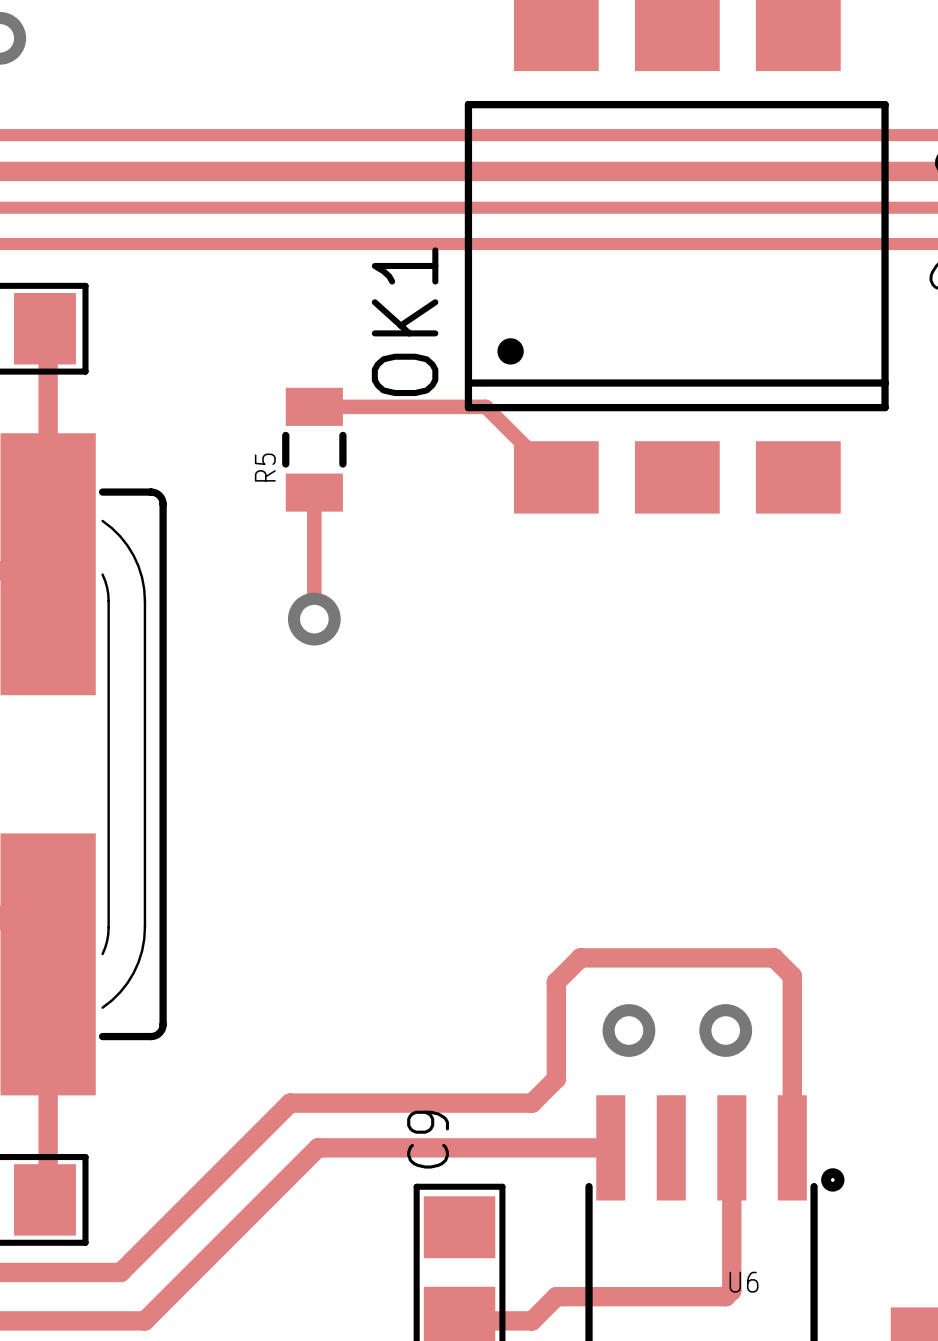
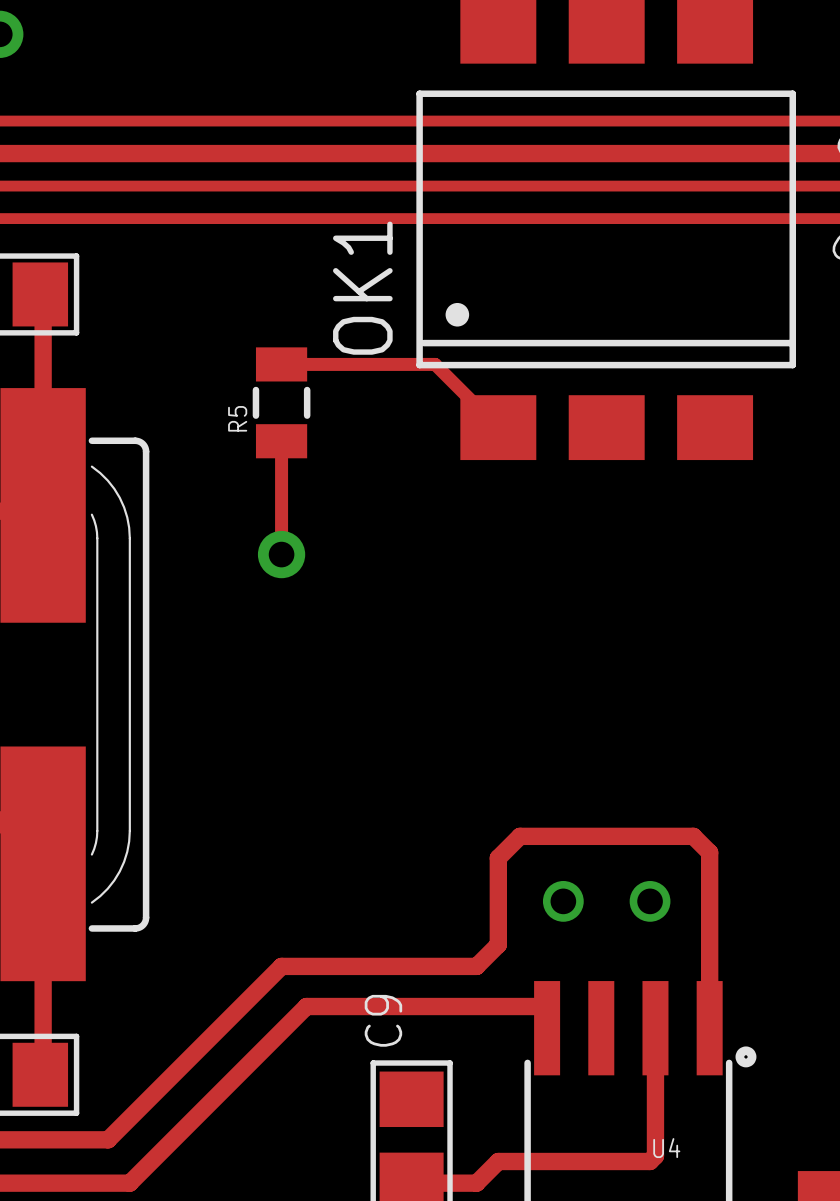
track: (792, 976) (774, 957) (580, 957) (556, 982) -> (709, 874) (709, 852) (693, 836) (520, 836) (498, 858) (498, 879)
via position: (628, 1030) -> (563, 901)
via position: (725, 1030) -> (650, 901)
track: (556, 1054) (556, 1078) (532, 1103) (290, 1103) -> (498, 944) (476, 966) (281, 966) (259, 988)
track: (317, 1147) (610, 1147) -> (284, 1028) (306, 1006) (547, 1006)
U6 name: U6 (744, 1282) -> U4 (666, 1148)

